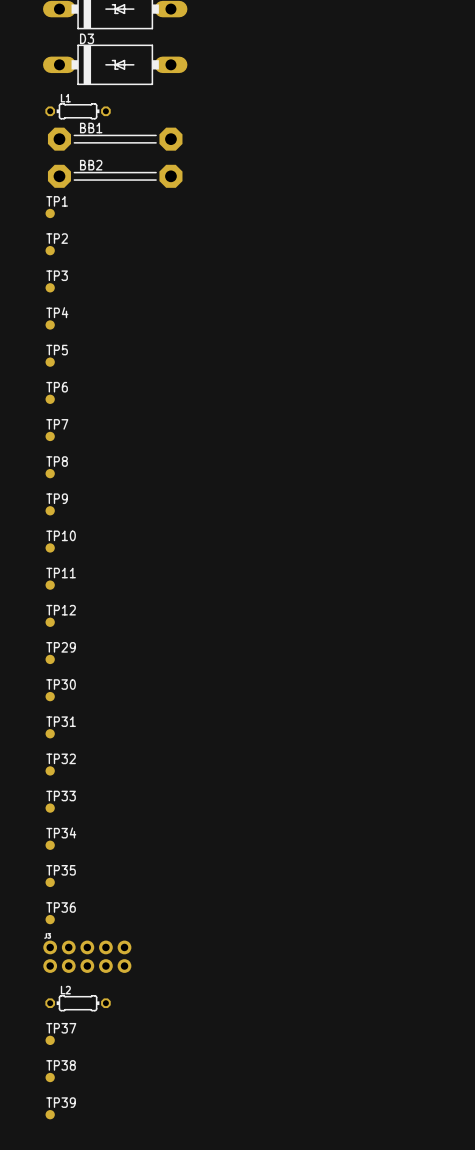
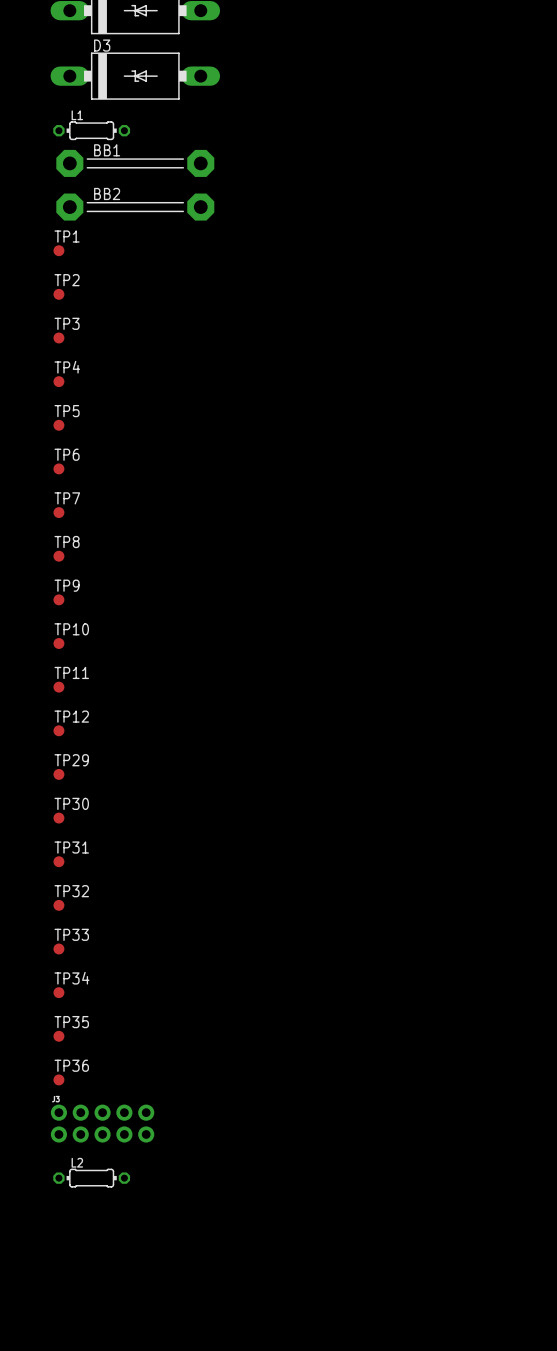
TP37: (50, 1040) -> none
TP38: (50, 1077) -> none
TP39: (50, 1114) -> none

